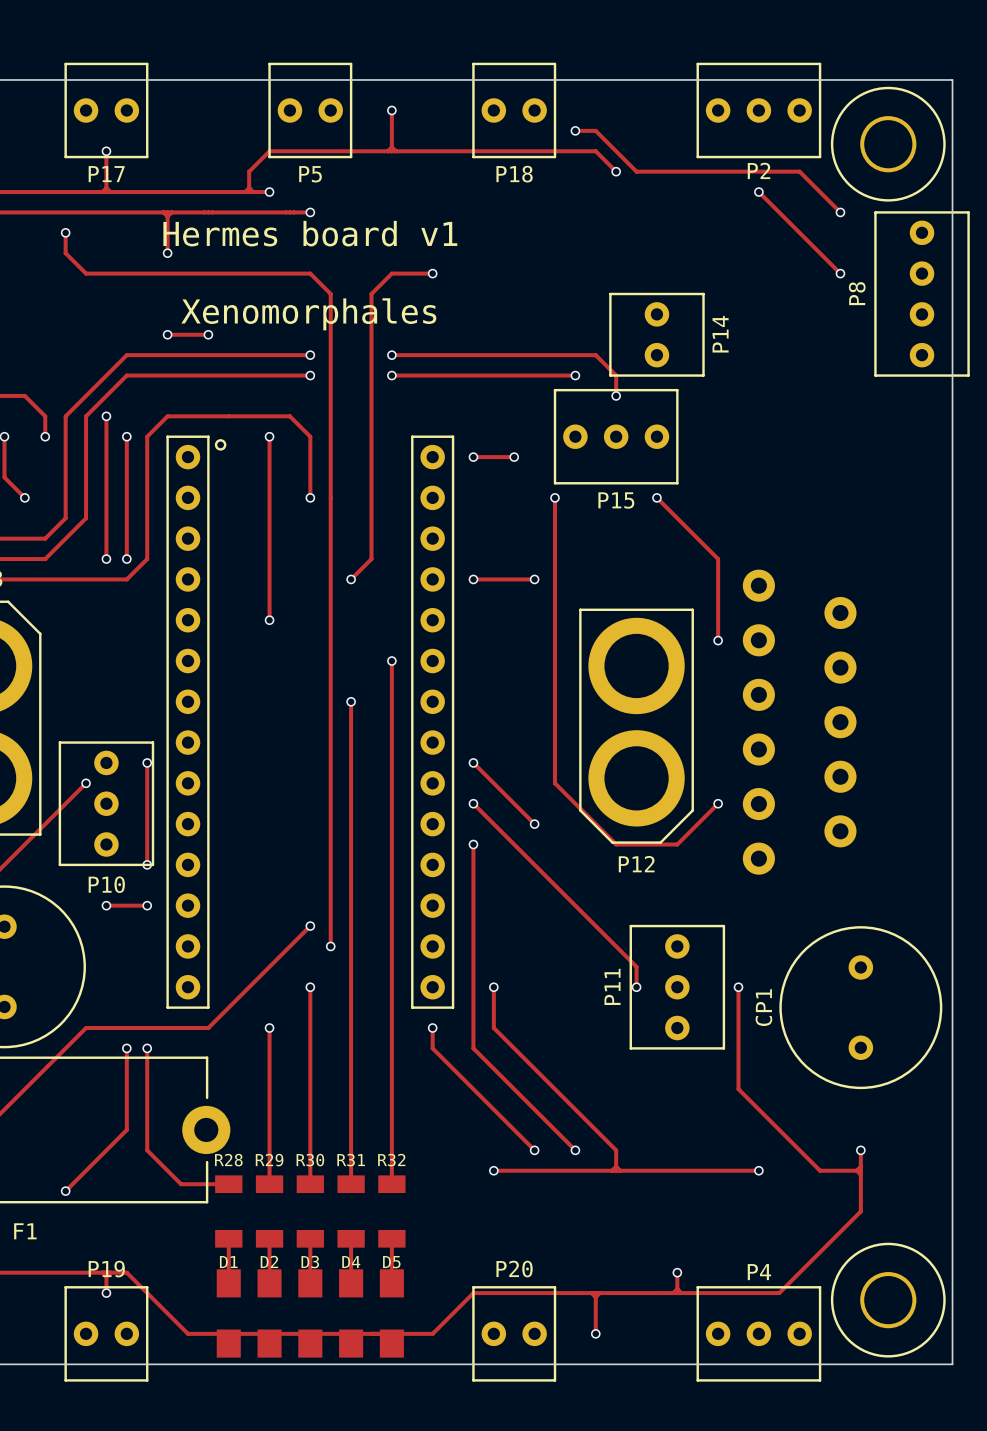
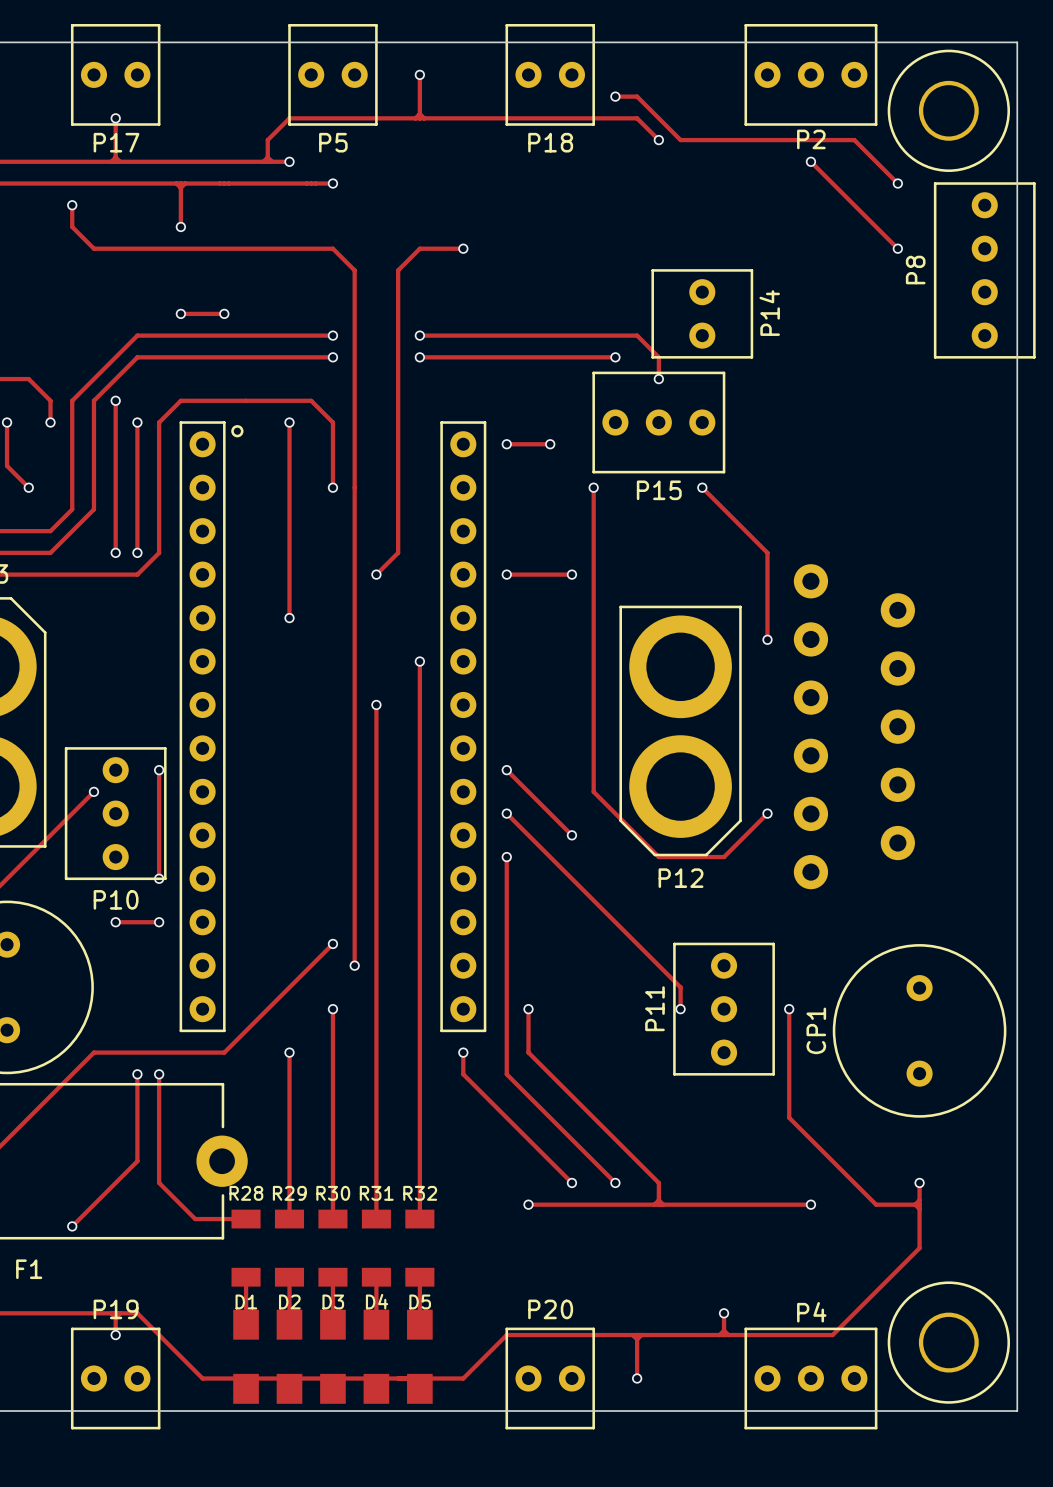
text: Hermes board v1 (310, 233) -> none
text: Xenomorphales (308, 314) -> none

